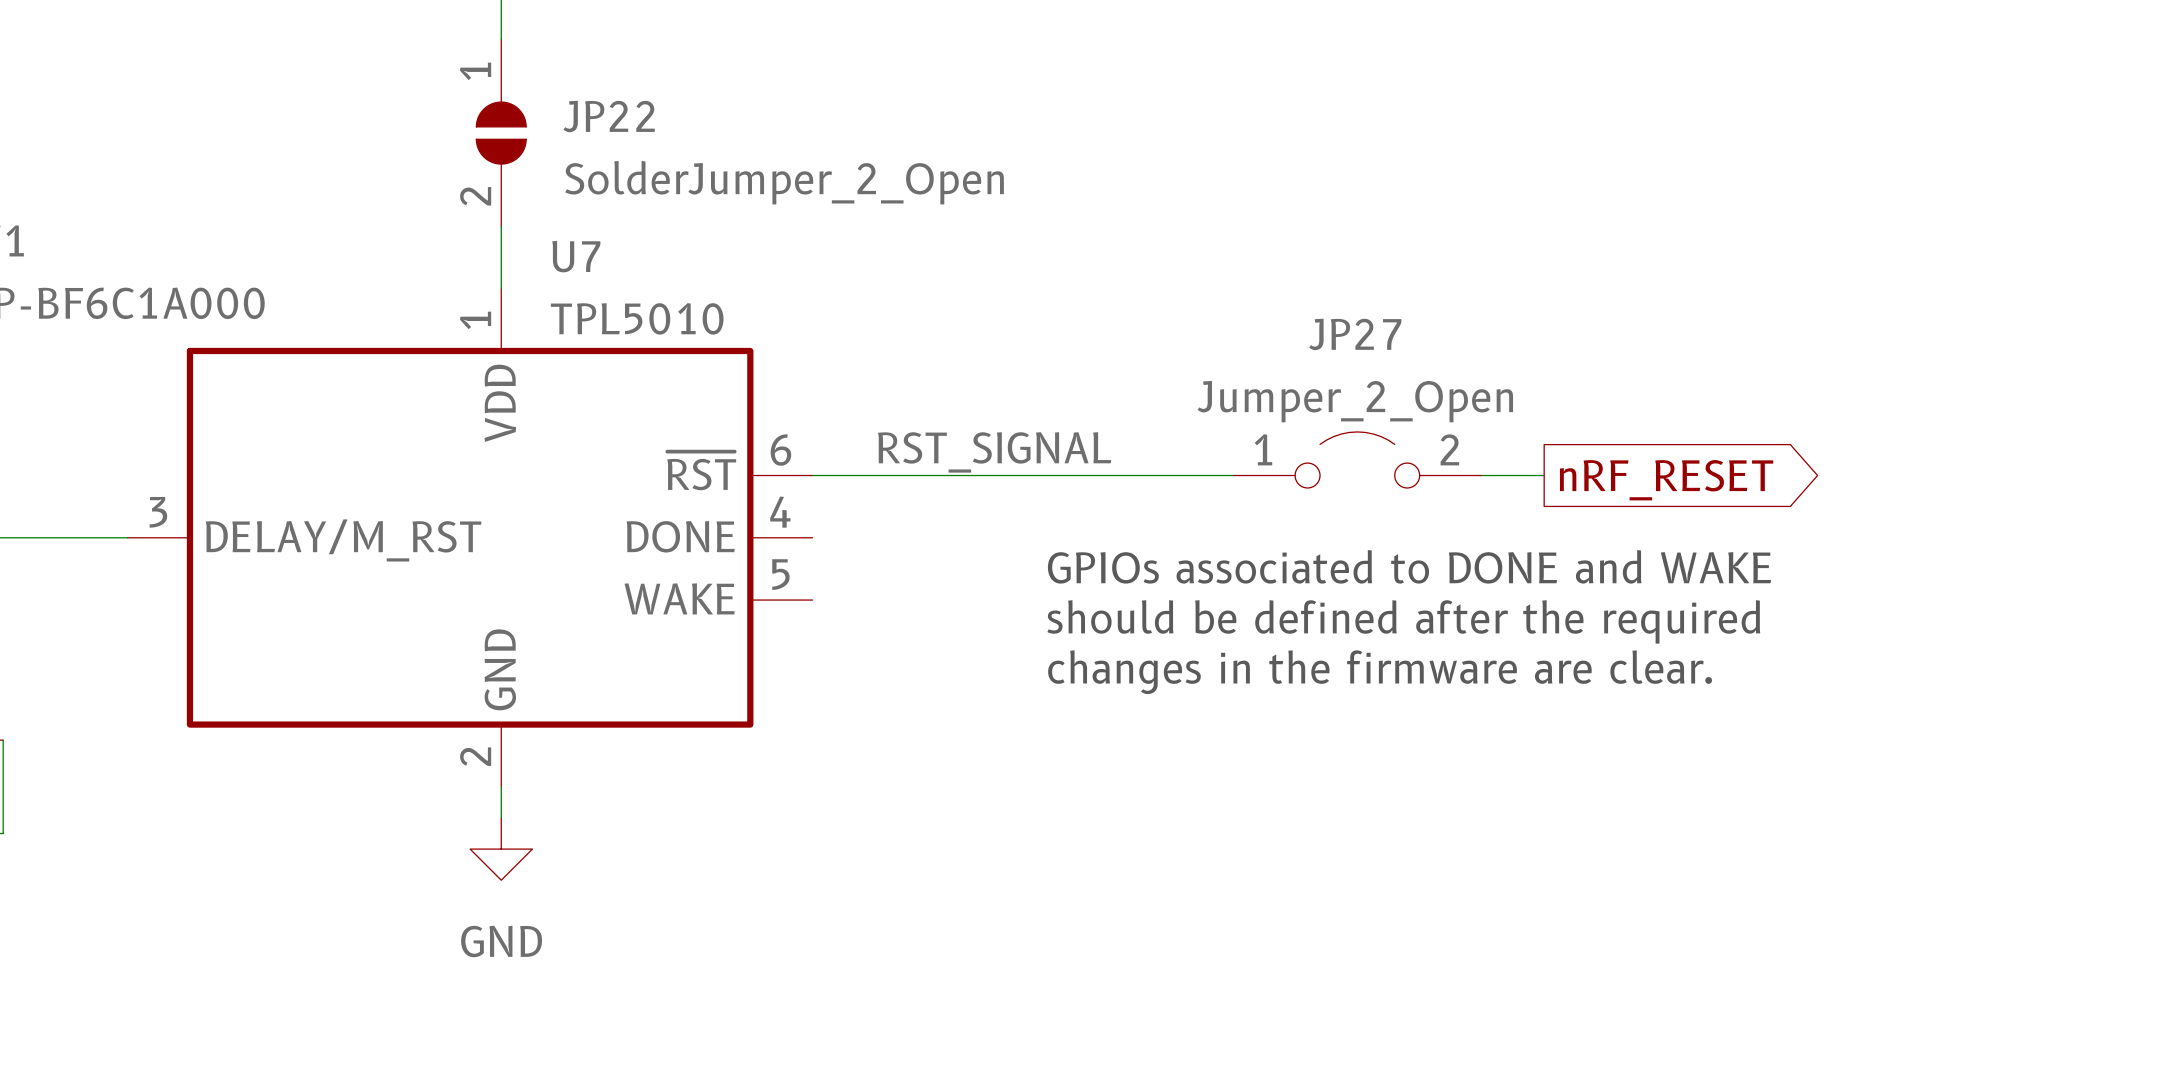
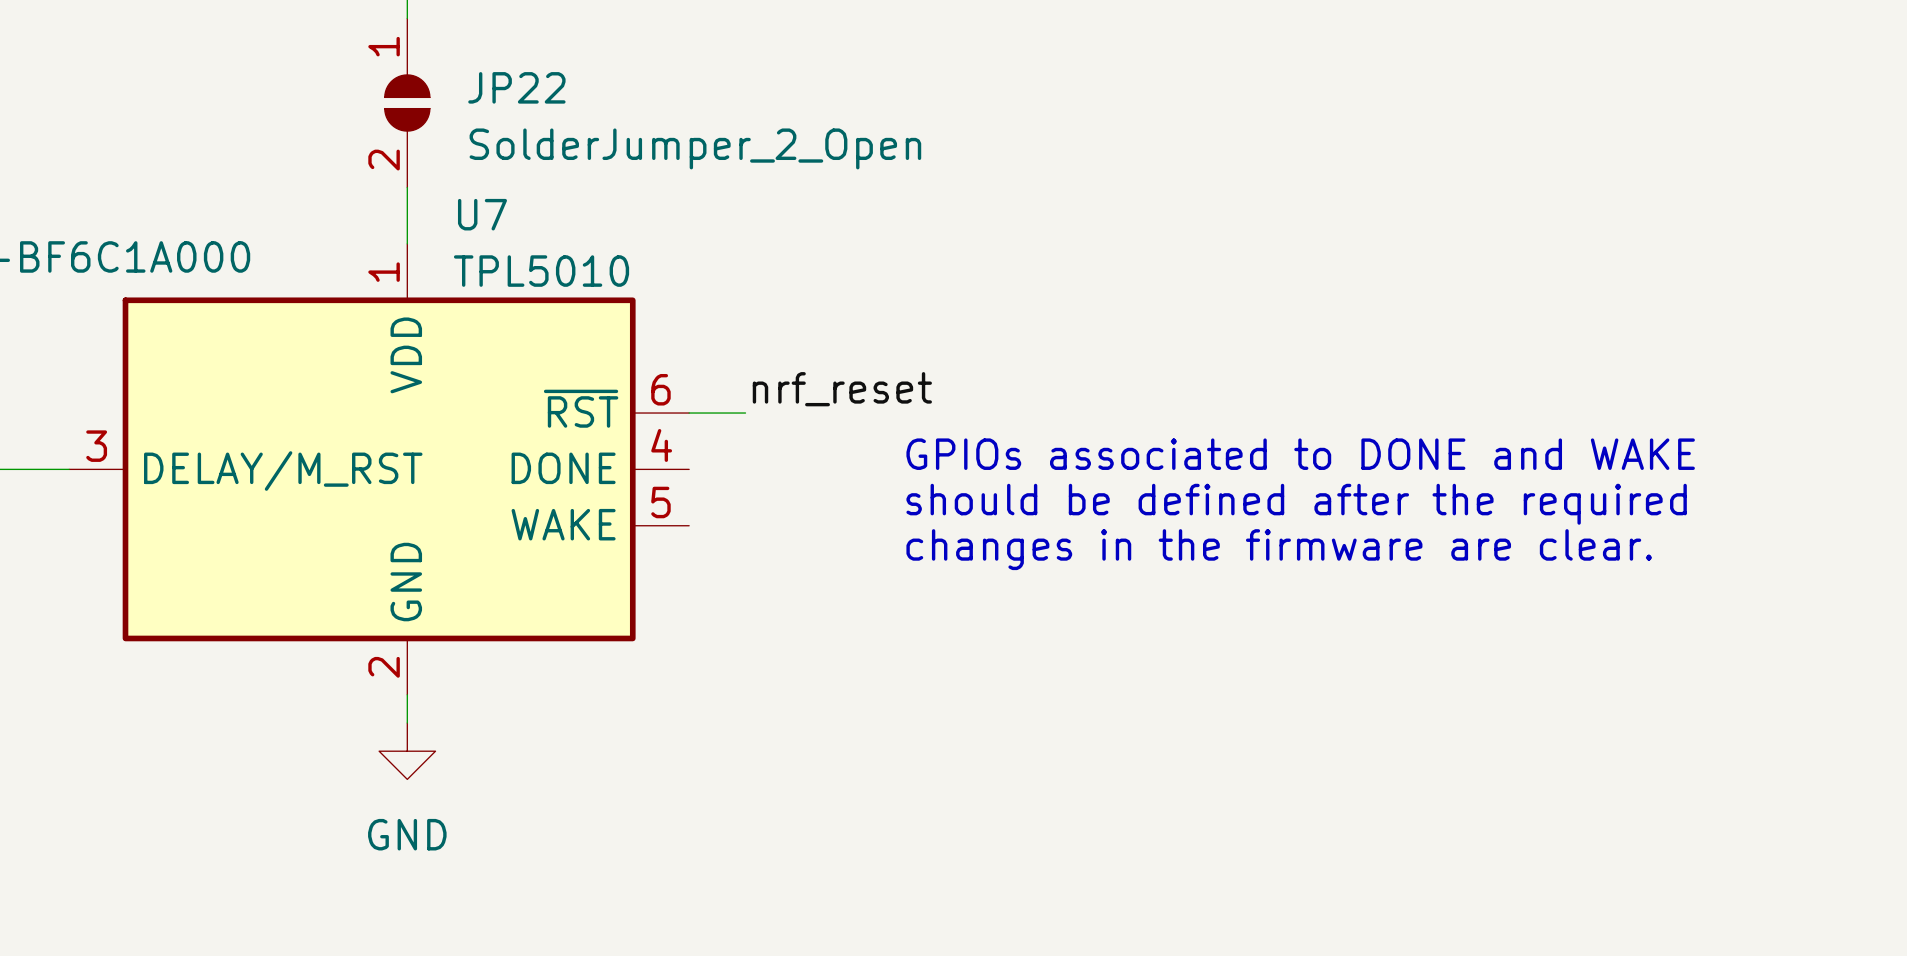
label: RST_SIGNAL (994, 452) -> nrf_reset (842, 389)
JP27: Jumper_2_Open (1357, 459) -> none
wire: (874, 475) (1232, 475) -> none
wire: (1481, 475) (1544, 475) -> none
global label: nRF_RESET (1666, 480) -> none
text position: GPIOs associated to DONE and WAKE (1409, 566) -> GPIOs associated to DONE and WAKE (1300, 454)
text position: should be defined after the required (1403, 621) -> should be defined after the required (1296, 504)
text position: changes in the firmware are clear. (1380, 672) -> changes in the firmware are clear. (1279, 549)

